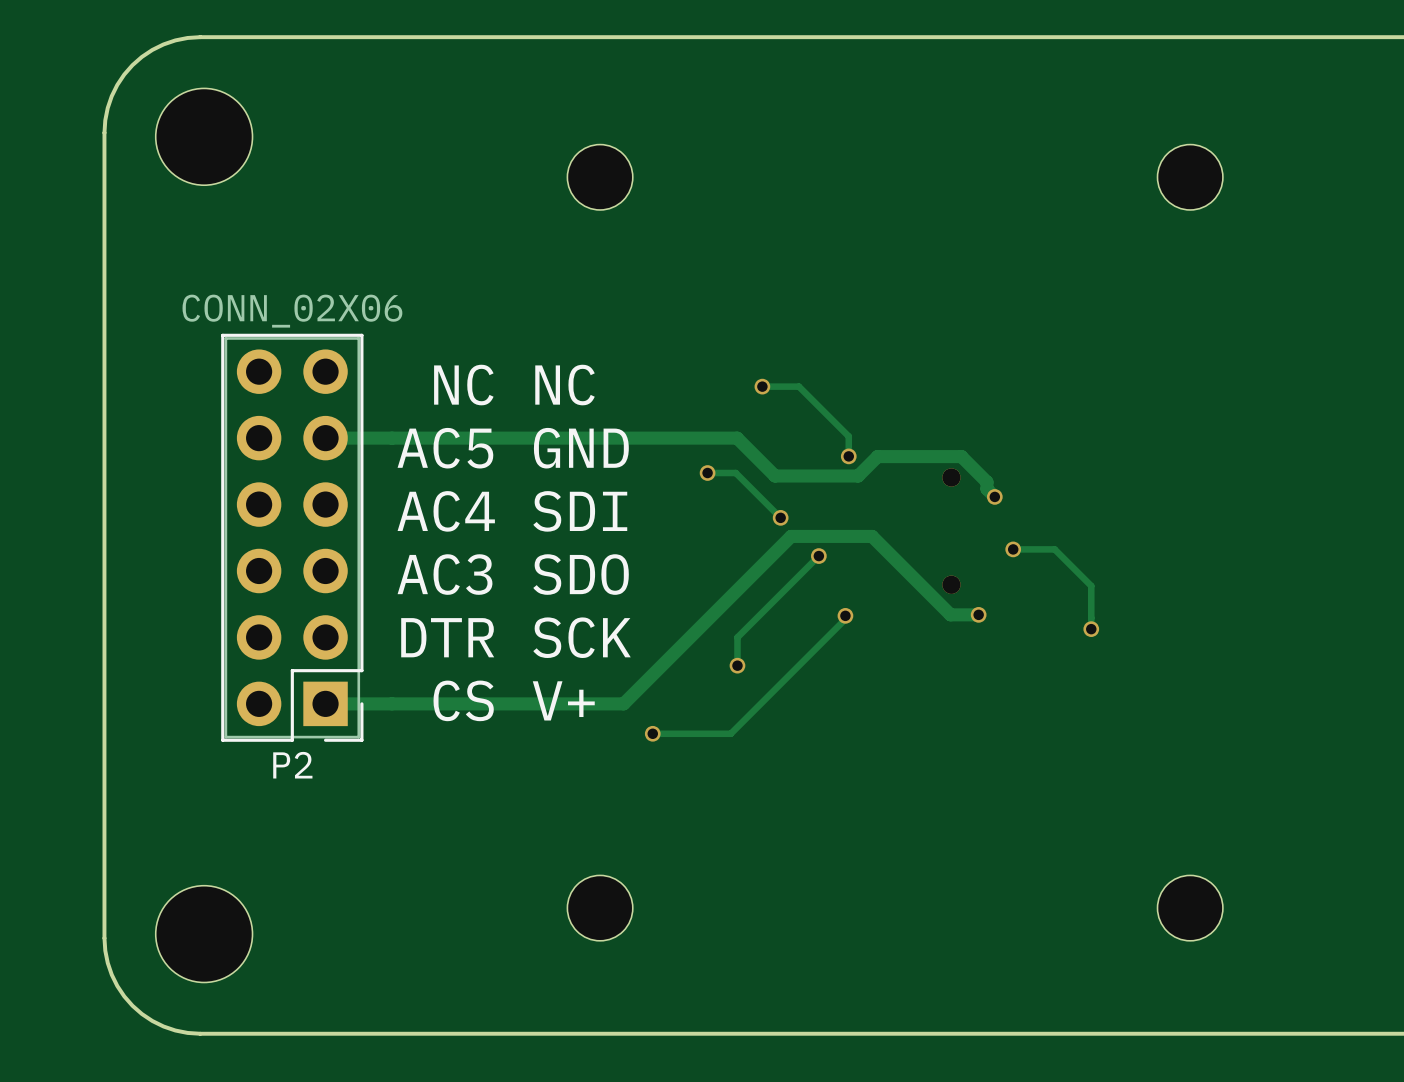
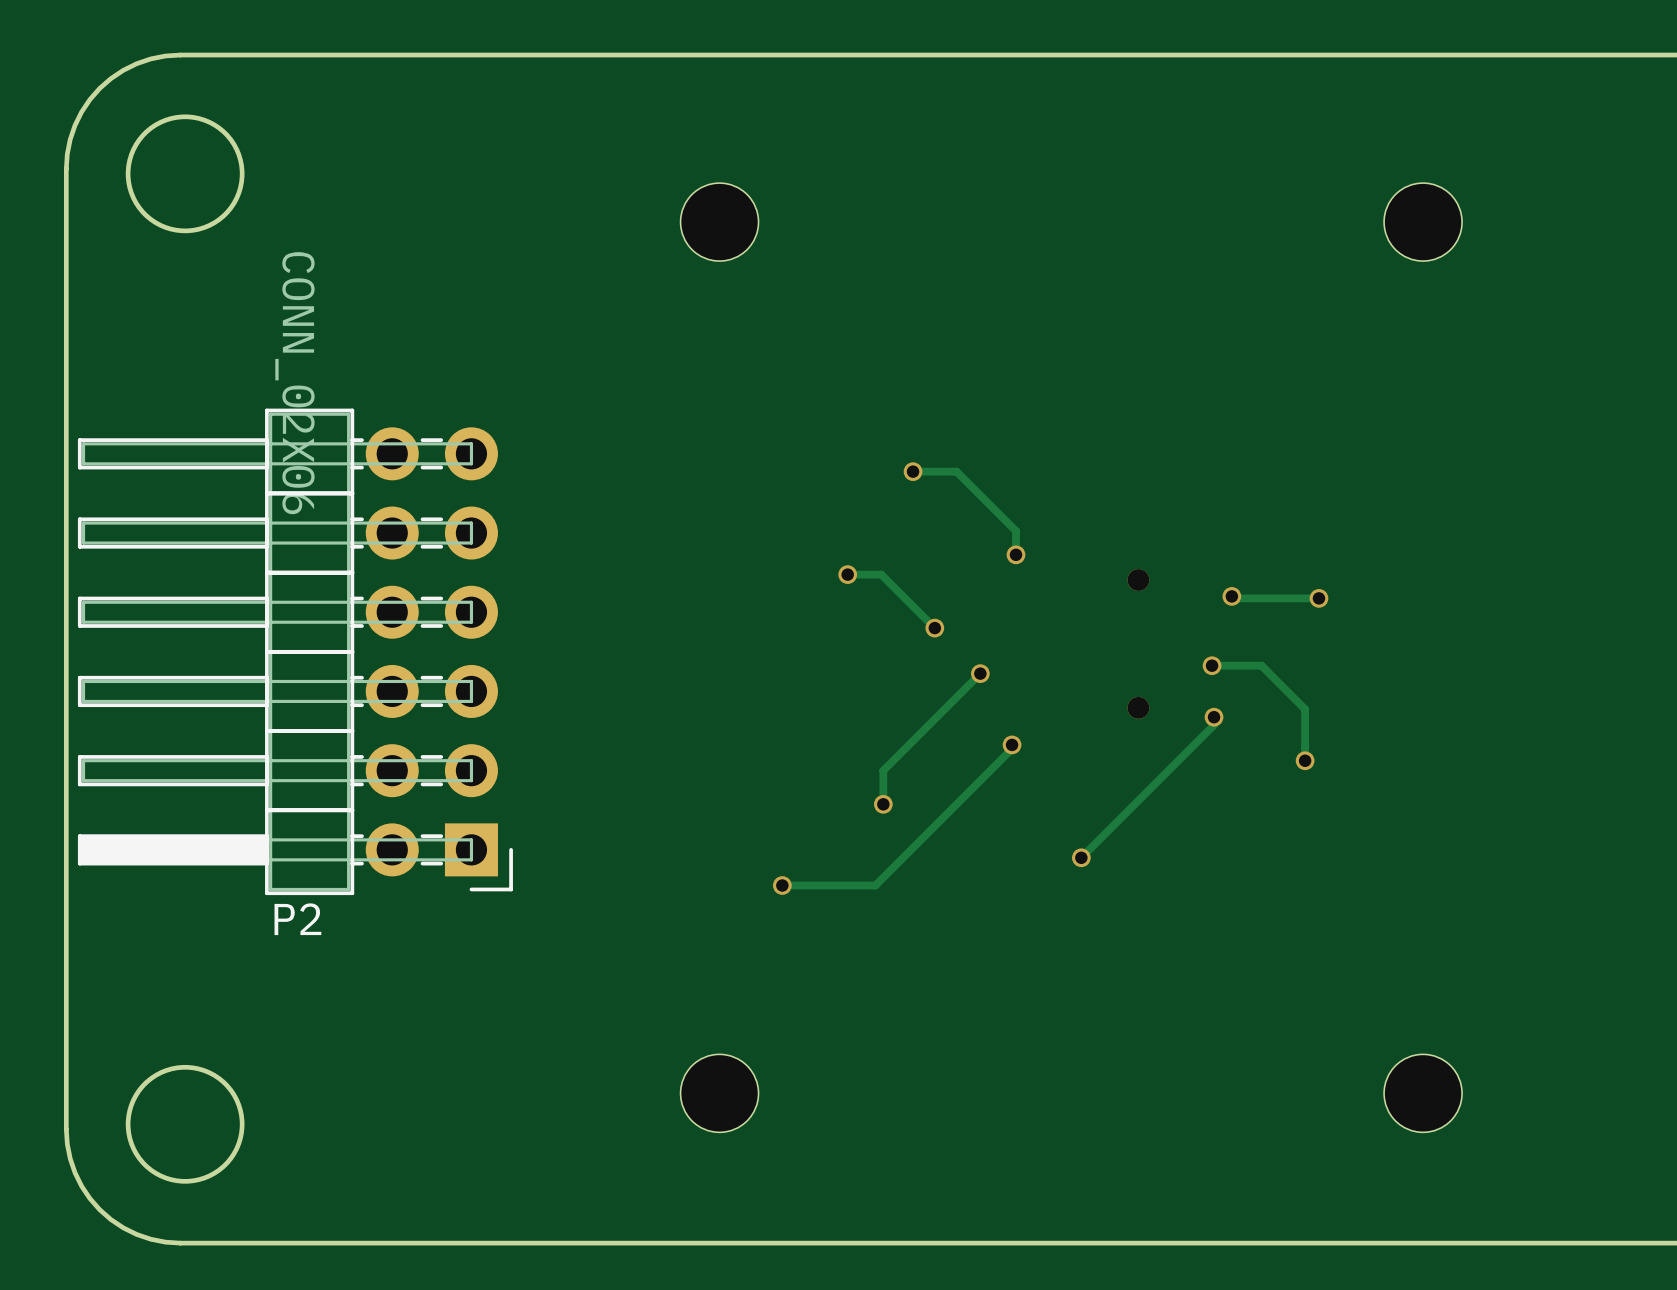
board edge: (200, 37) (175, 40) (163, 44) (152, 49) (132, 65) (117, 84) (111, 96) (105, 120) (104, 938) -> (242, 55) (165, 56) (150, 58) (123, 70) (99, 88) (81, 112) (75, 125) (67, 154) (66, 1129)
round board edge: none -> [125, 114, 245, 234]
part: (204, 136) -> none
P2 footprint: [221, 333, 364, 742] -> [77, 408, 513, 896]
text: NC NC (514, 385) -> none
track: (325, 438) (737, 438) (775, 476) (858, 476) (877, 456) (961, 456) (986, 482) (986, 489) (994, 496) -> none
text: AC5 GND (513, 448) -> none
track: none -> (1231, 596) (1233, 598) (1318, 598)
via: none -> (1318, 598)
via position: (994, 496) -> (1231, 596)
text: AC4 SDI (512, 511) -> none
text: AC3 SDO (513, 574) -> none
track: none -> (1214, 717) (1214, 725) (1081, 857)
track: (978, 614) (950, 614) (872, 536) (791, 536) (623, 703) (325, 703) -> none
via position: (978, 614) -> (1214, 717)
text: DTR SCK (515, 637) -> none
text: CS V+ (514, 700) -> none
via: none -> (1081, 857)
round board edge: none -> [125, 1064, 245, 1184]
part: (204, 934) -> none
board edge: (104, 938) (107, 962) (111, 974) (117, 986) (132, 1005) (141, 1014) (163, 1026) (175, 1030) (200, 1033) -> (66, 1129) (70, 1158) (81, 1186) (99, 1209) (123, 1227) (150, 1239) (165, 1242) (242, 1243)

